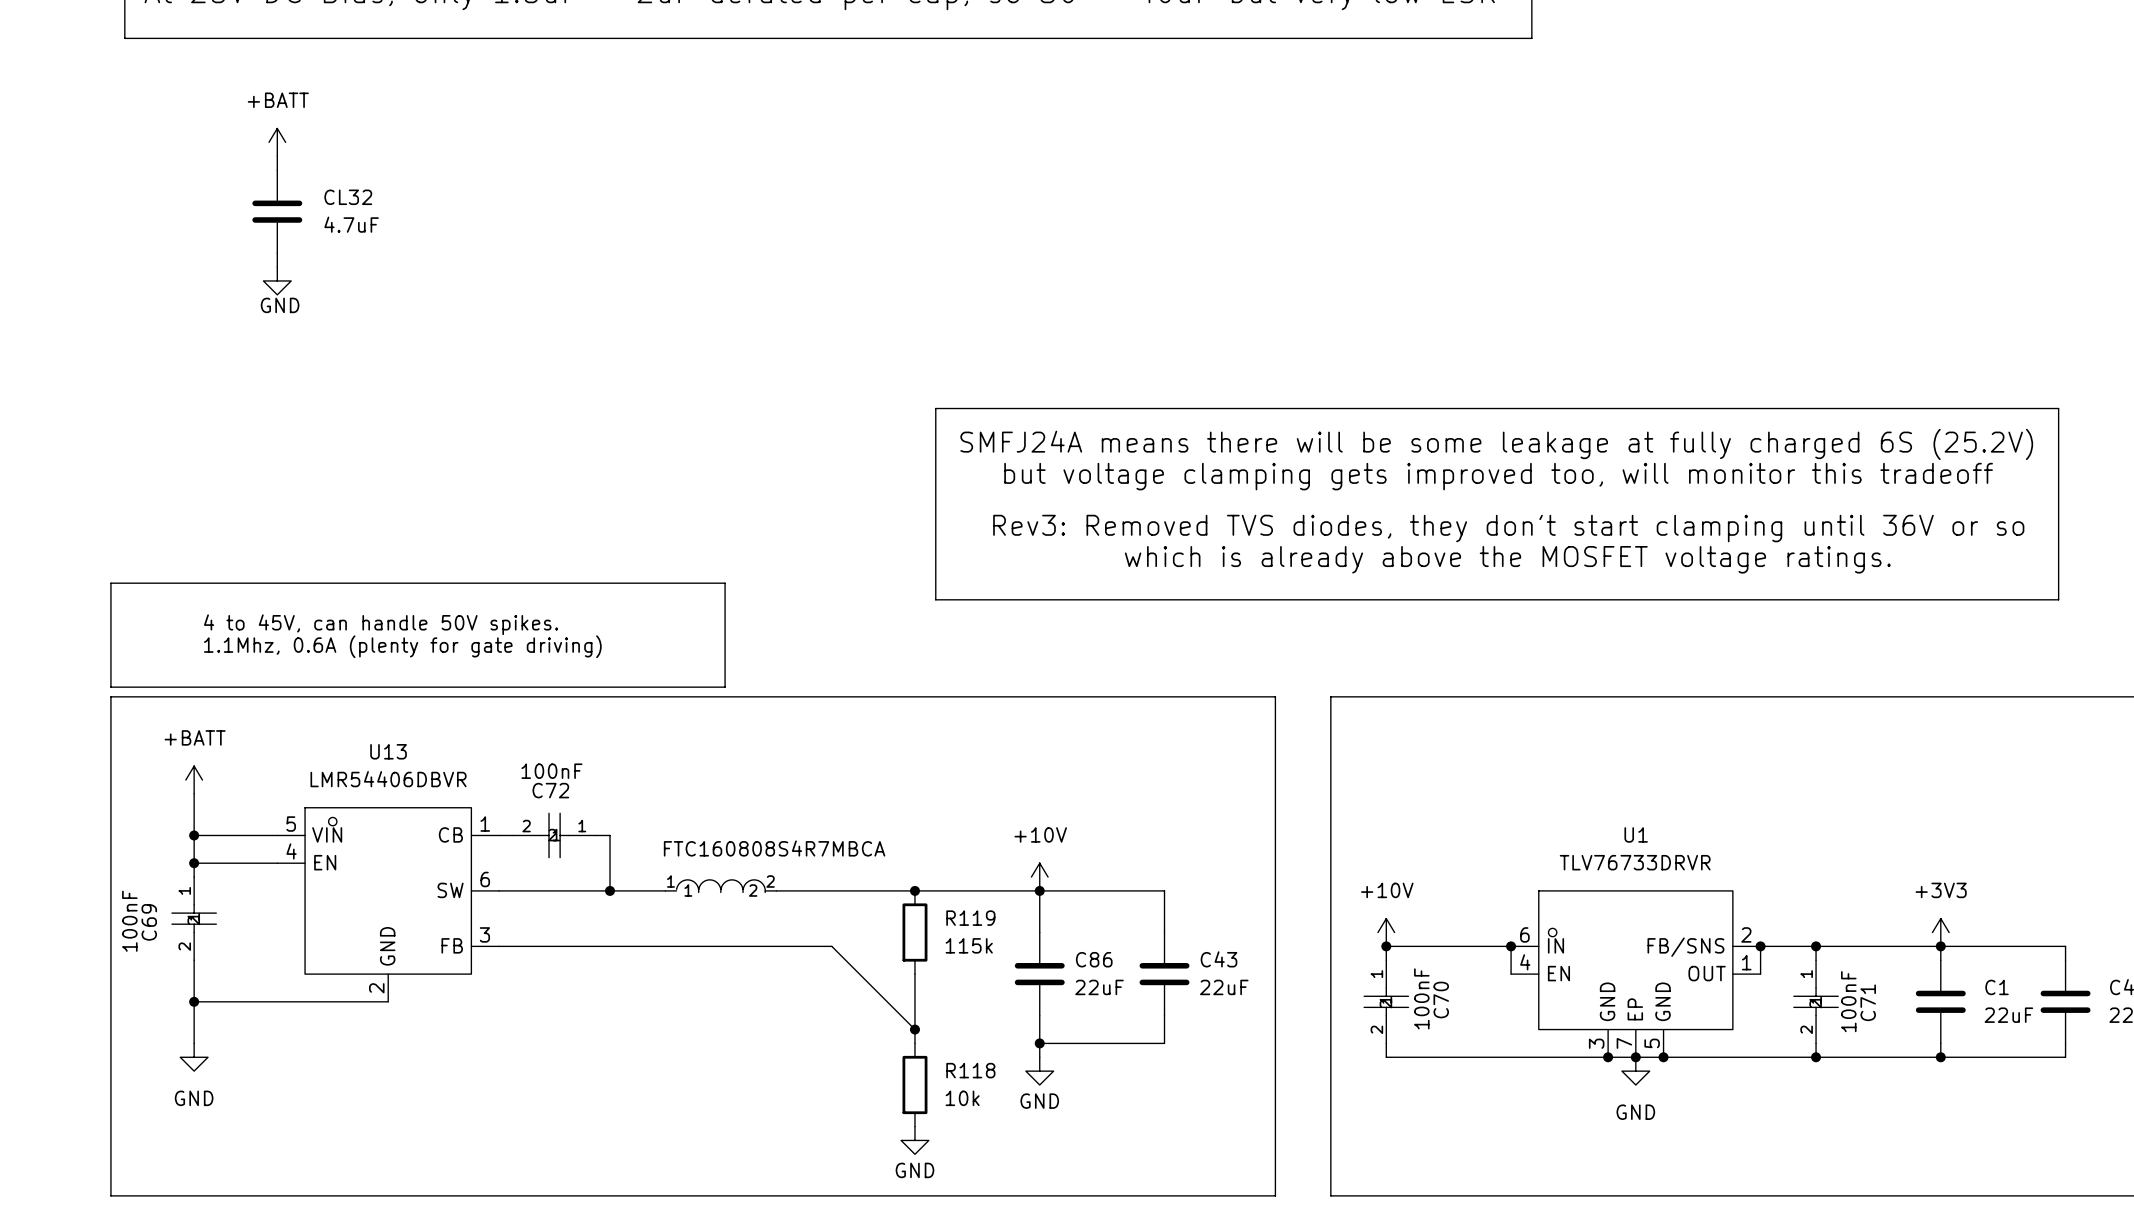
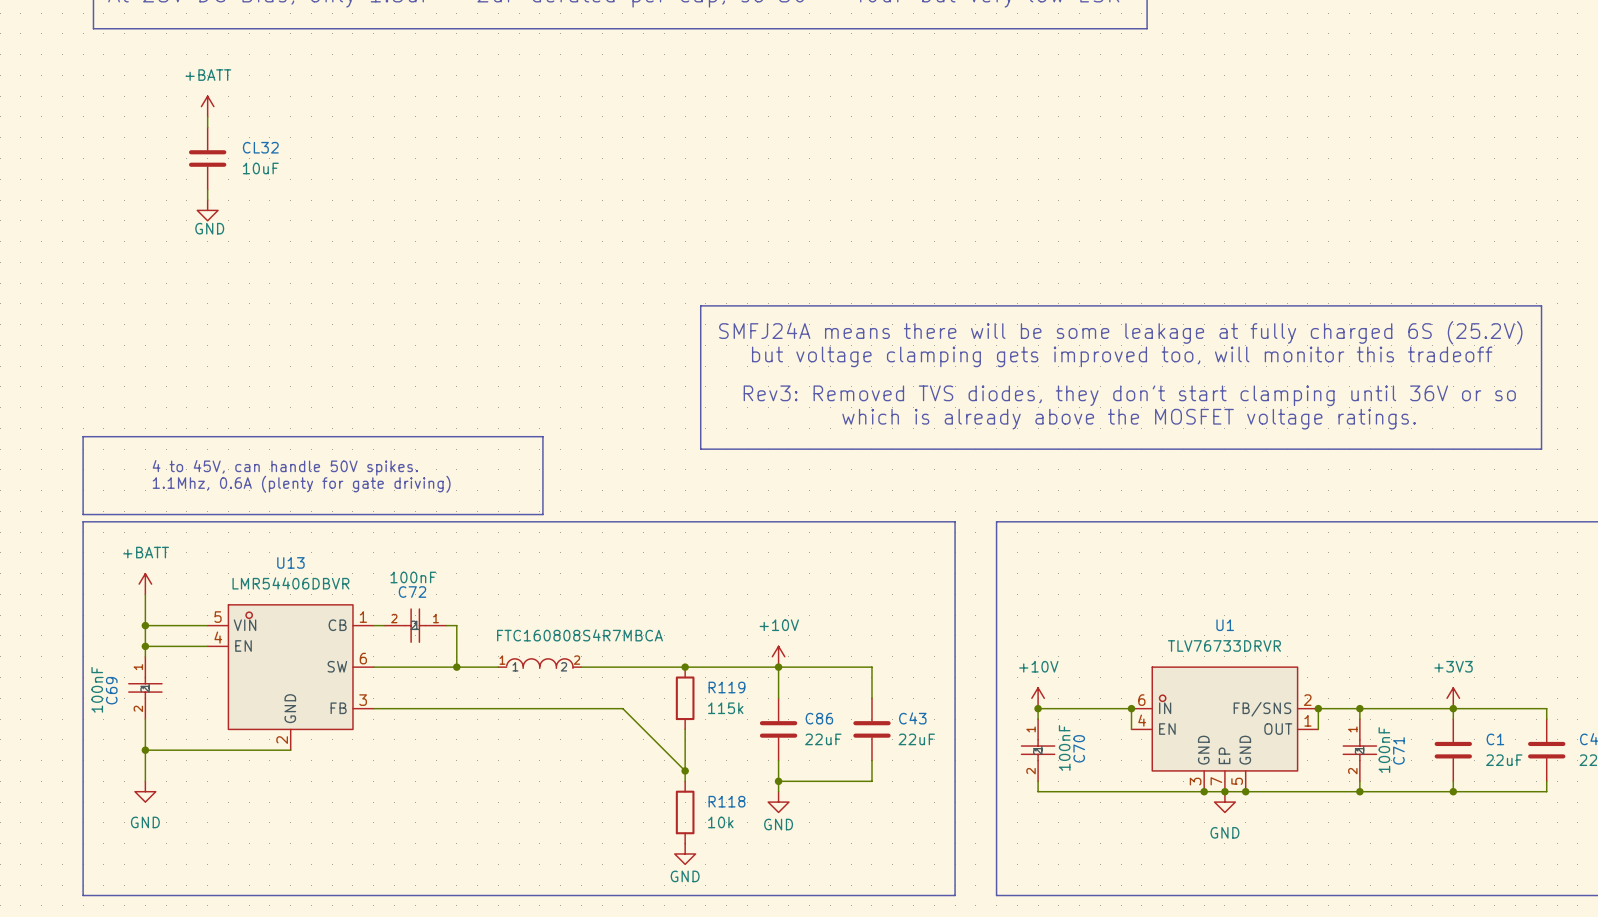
CL32 value: 4.7uF (351, 224) -> 10uF (260, 168)

